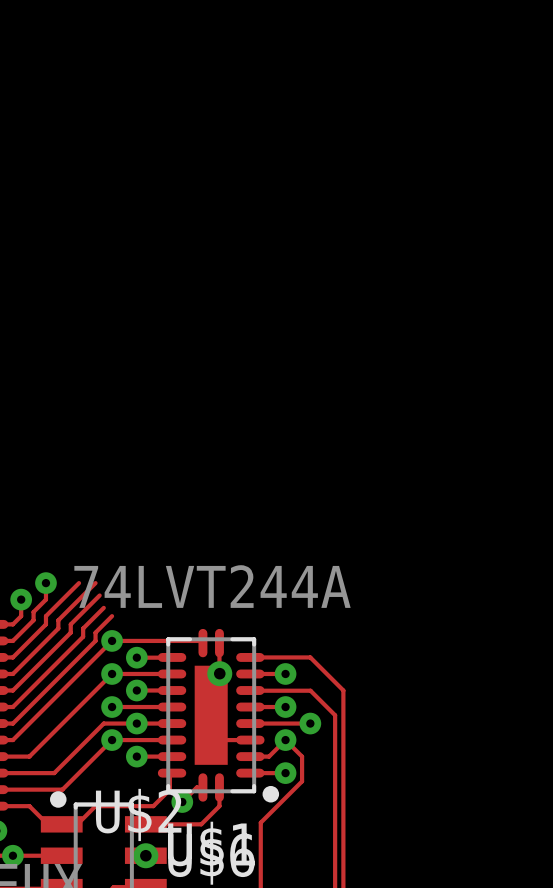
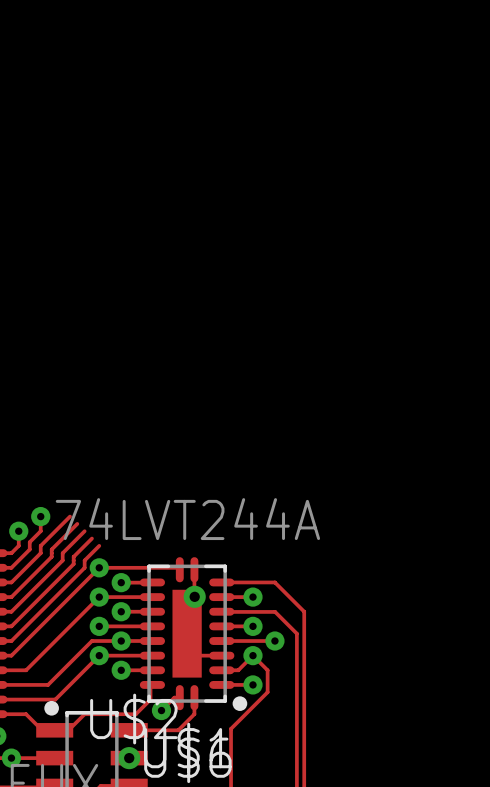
track: (95, 583) (87, 591) -> none
track: (99, 595) (95, 599) -> none

